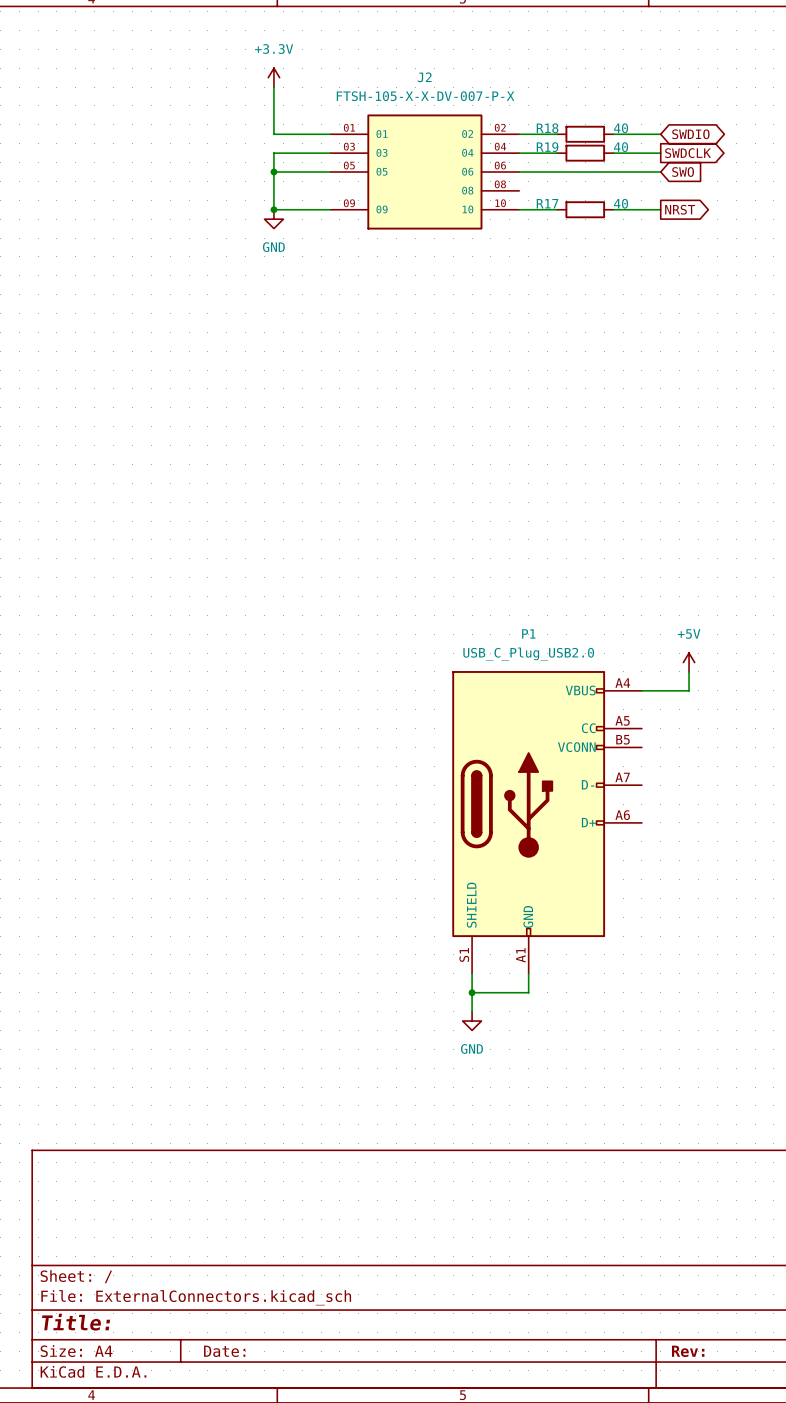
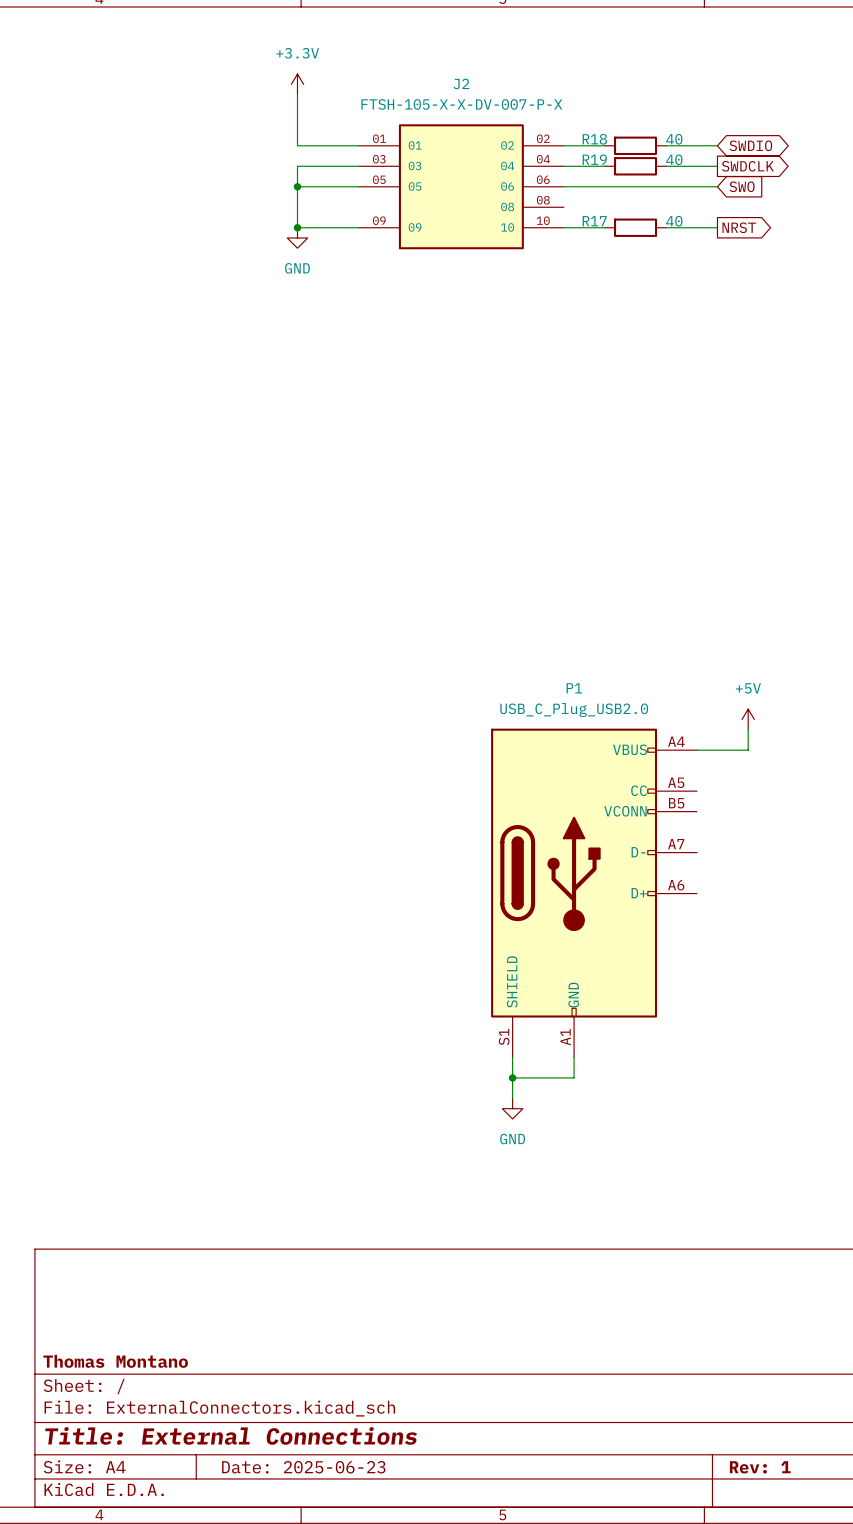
title block: none -> Thomas Montano (115, 1361)
title block: Title: (76, 1322) -> Title: External Connections (231, 1435)
title block: Date: (224, 1351) -> Date: 2025-06-23 (303, 1467)
title block: Rev: (688, 1351) -> Rev: 1 (760, 1467)

